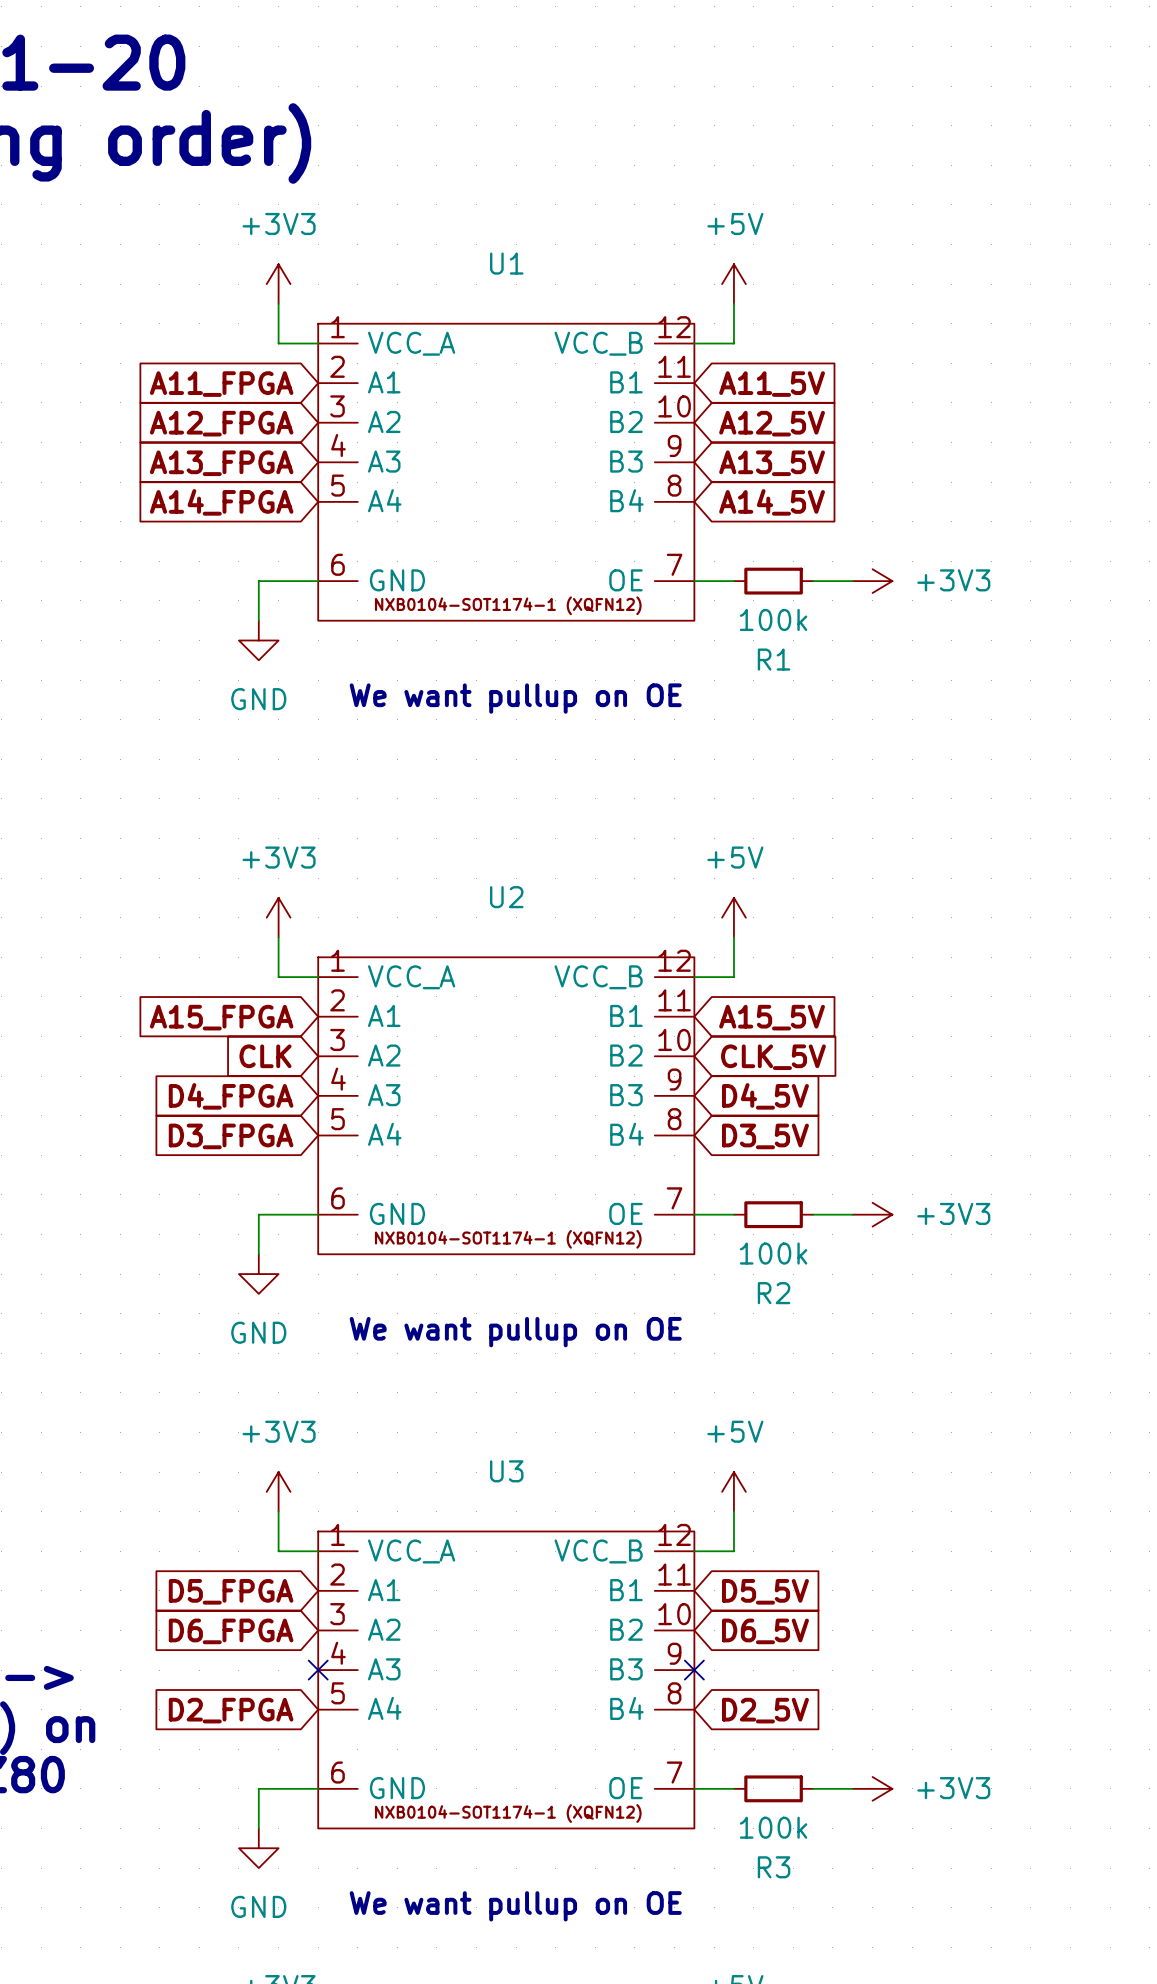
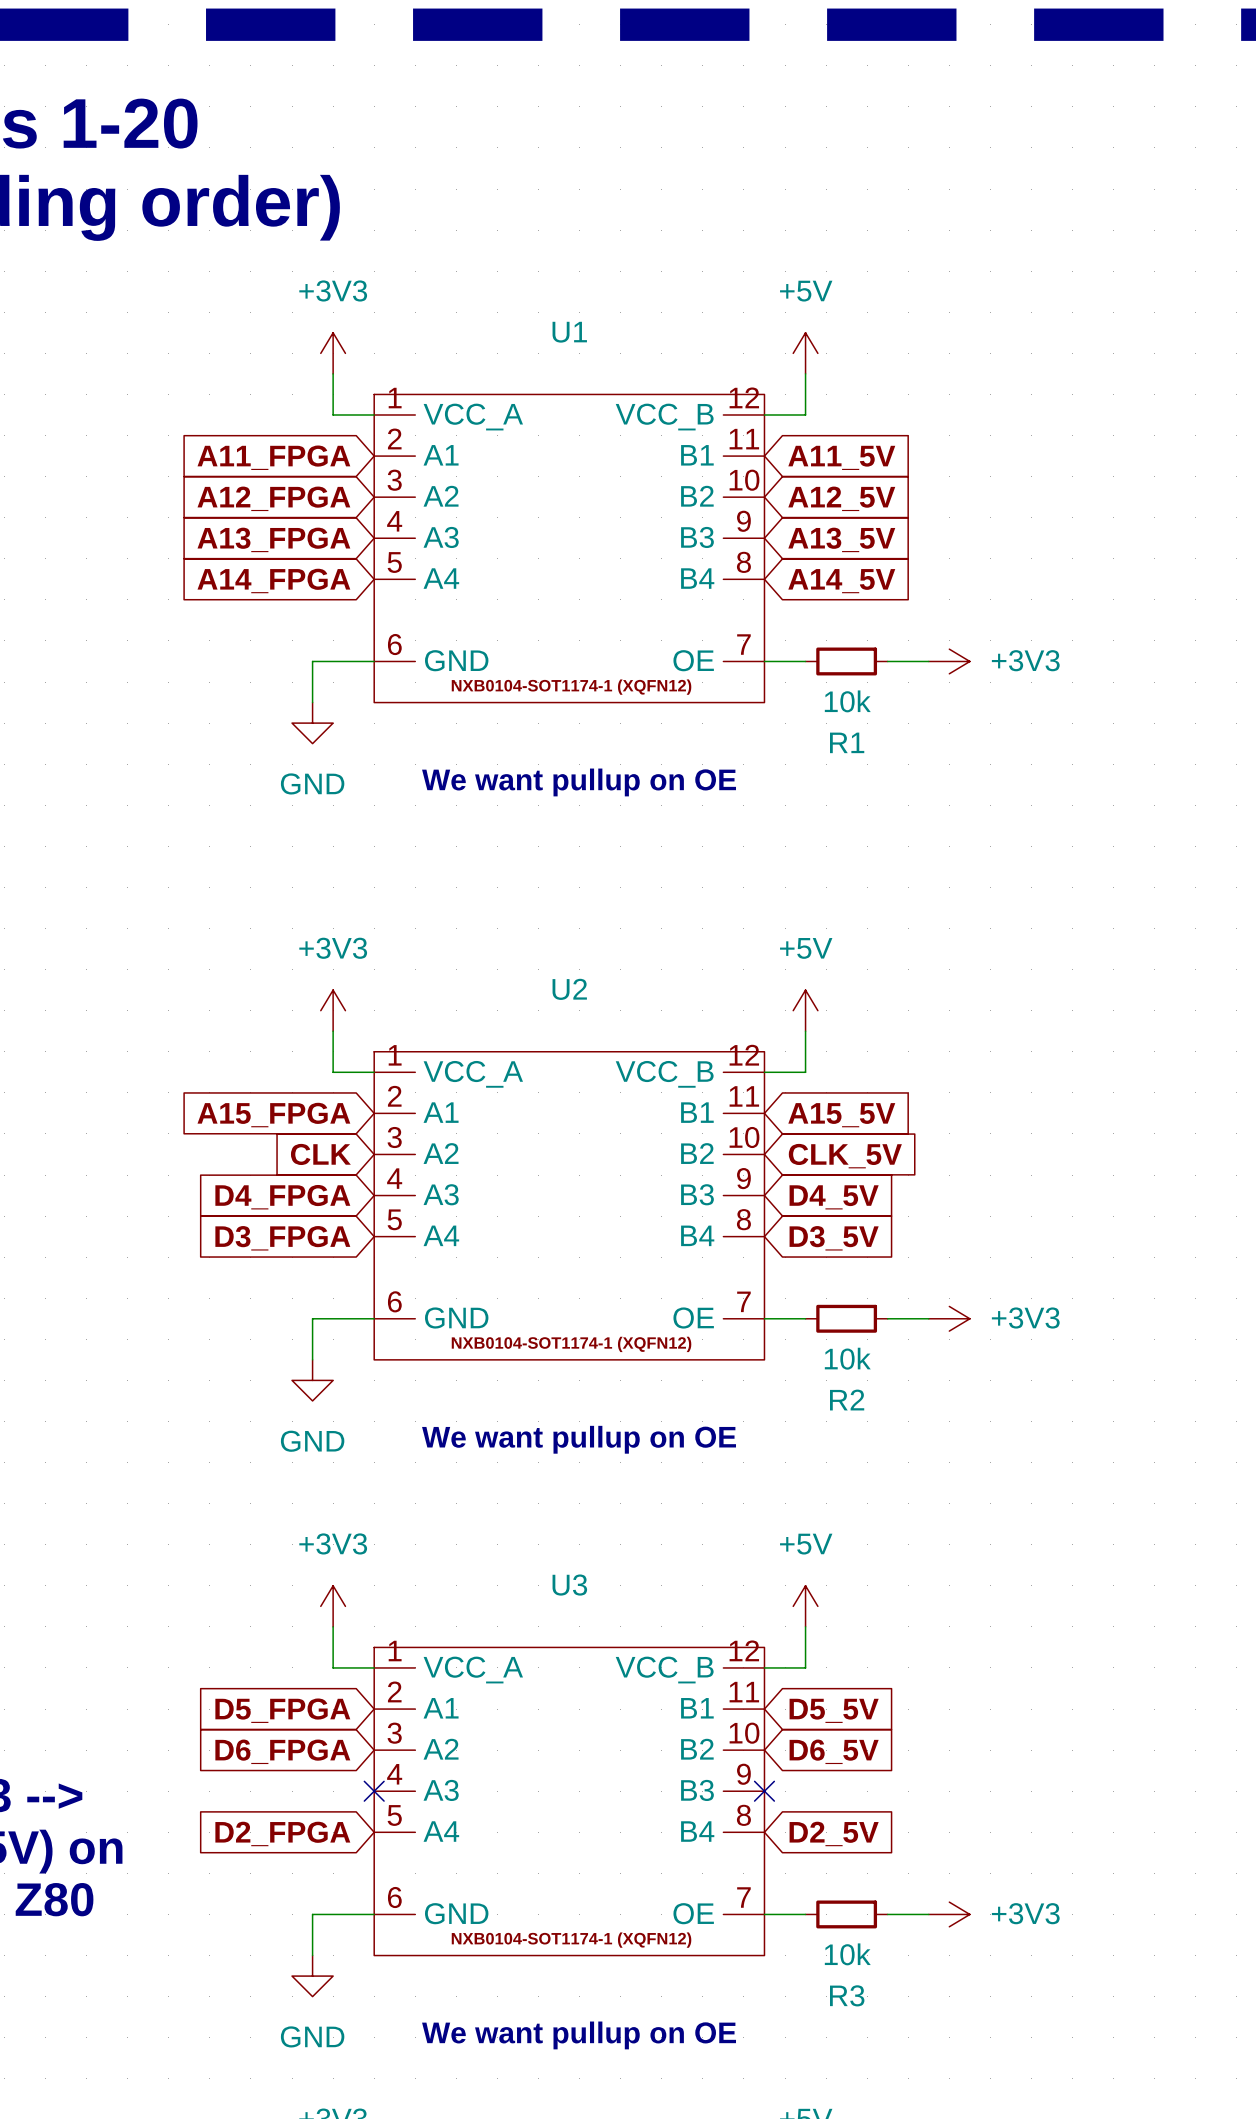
R1 value: 100k (773, 619) -> 10k (847, 701)
R2 value: 100k (773, 1253) -> 10k (847, 1358)
R3 value: 100k (773, 1827) -> 10k (847, 1954)

